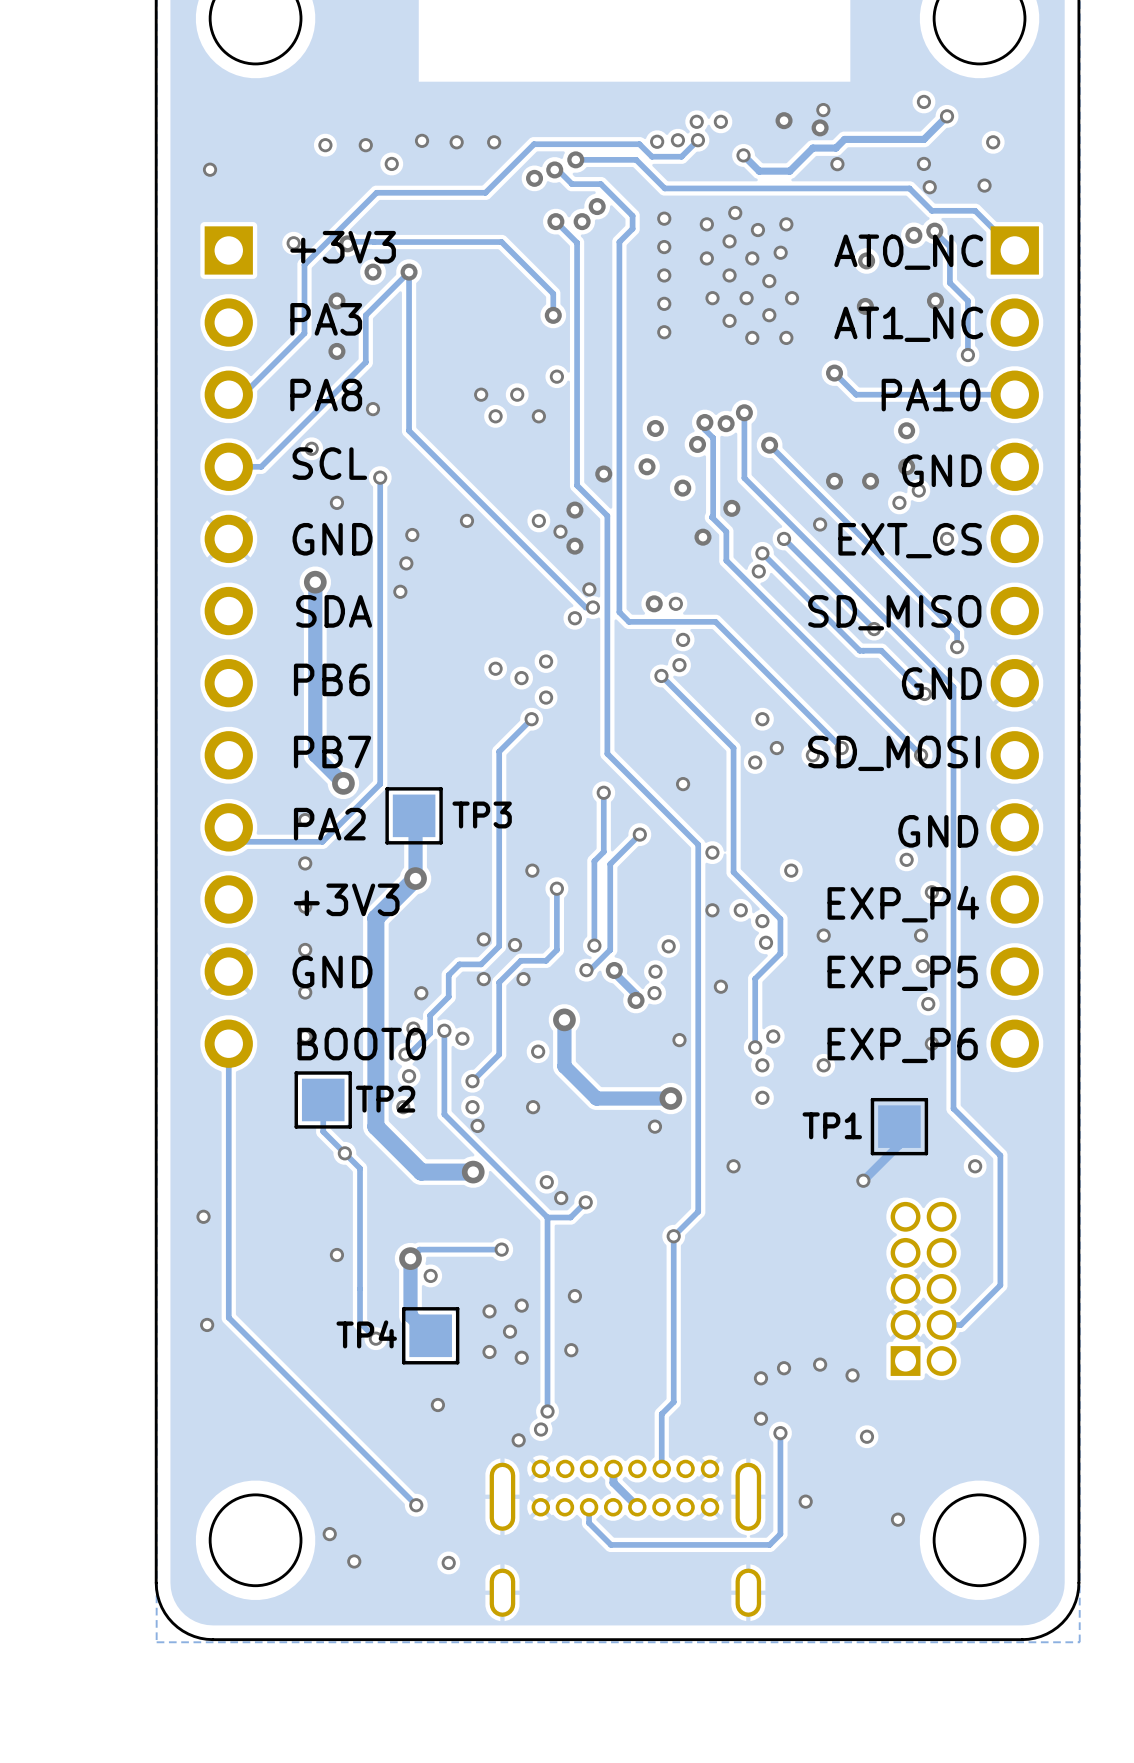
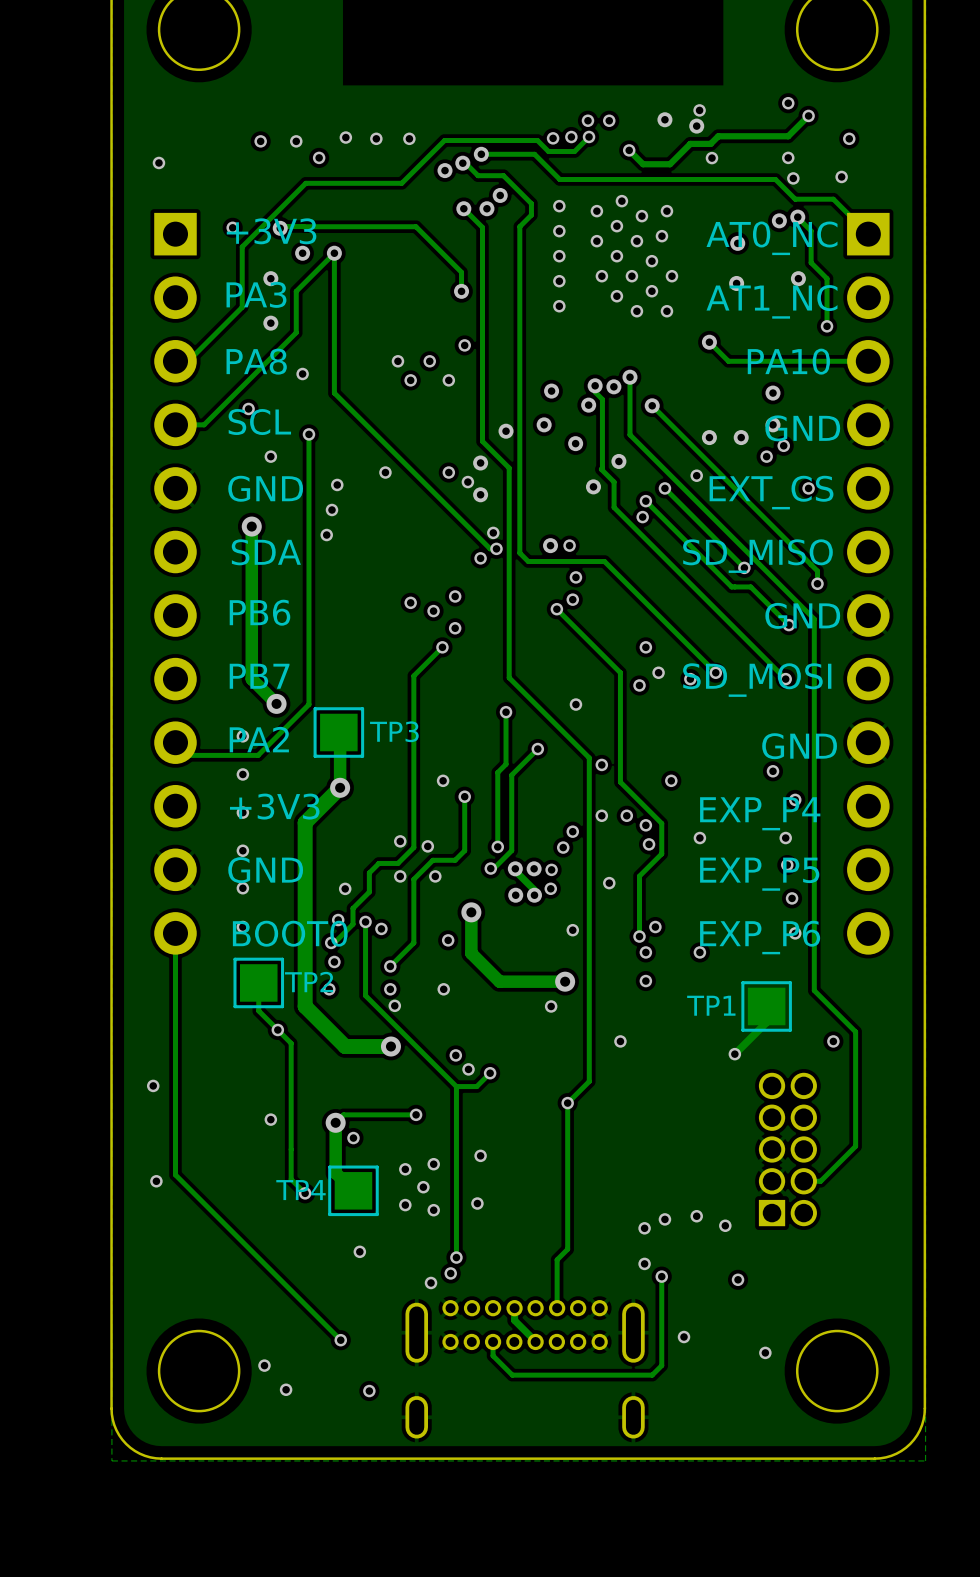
via: none -> (572, 831)
via: none -> (534, 868)
via: none -> (515, 895)

